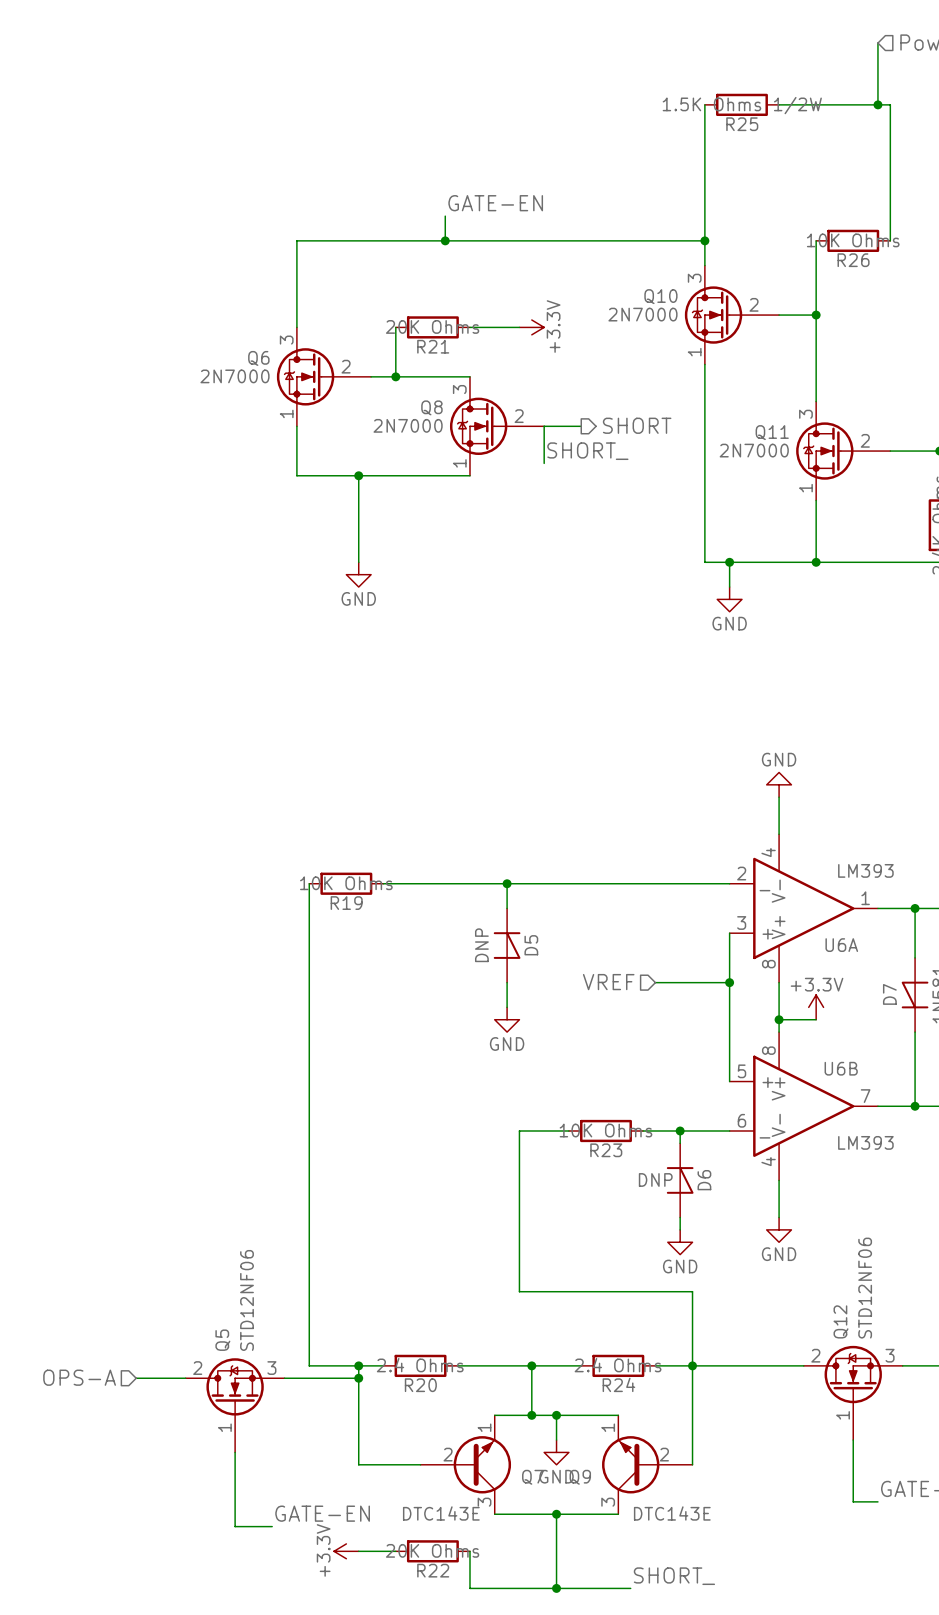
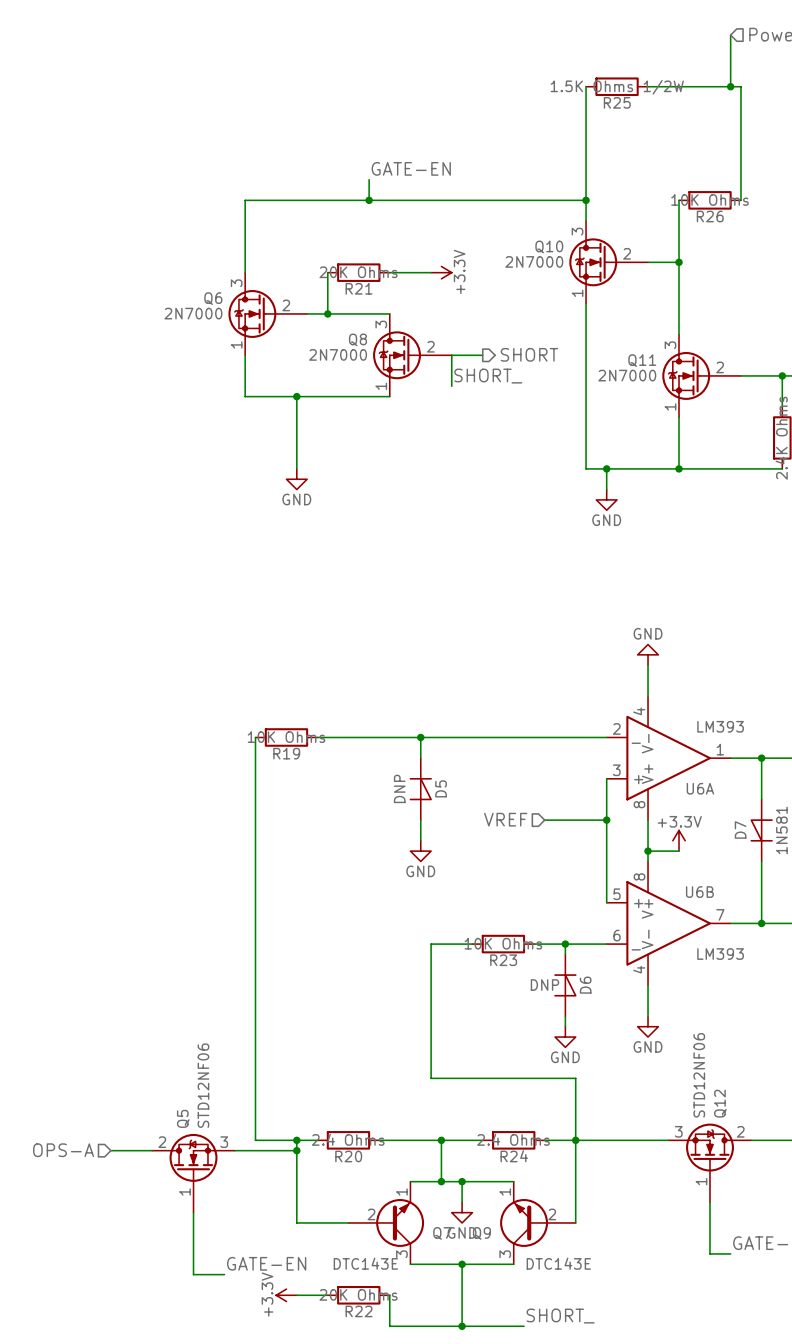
Q12 flip: as is (853, 1374) -> left-right (709, 1147)

